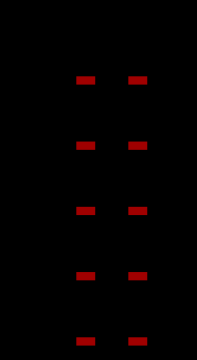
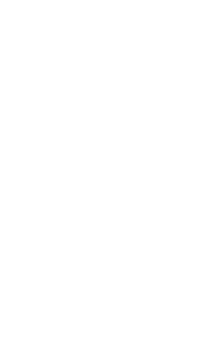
part: (111, 80) -> none
part: (111, 145) -> none
part: (111, 210) -> none
part: (111, 276) -> none
part: (111, 341) -> none

